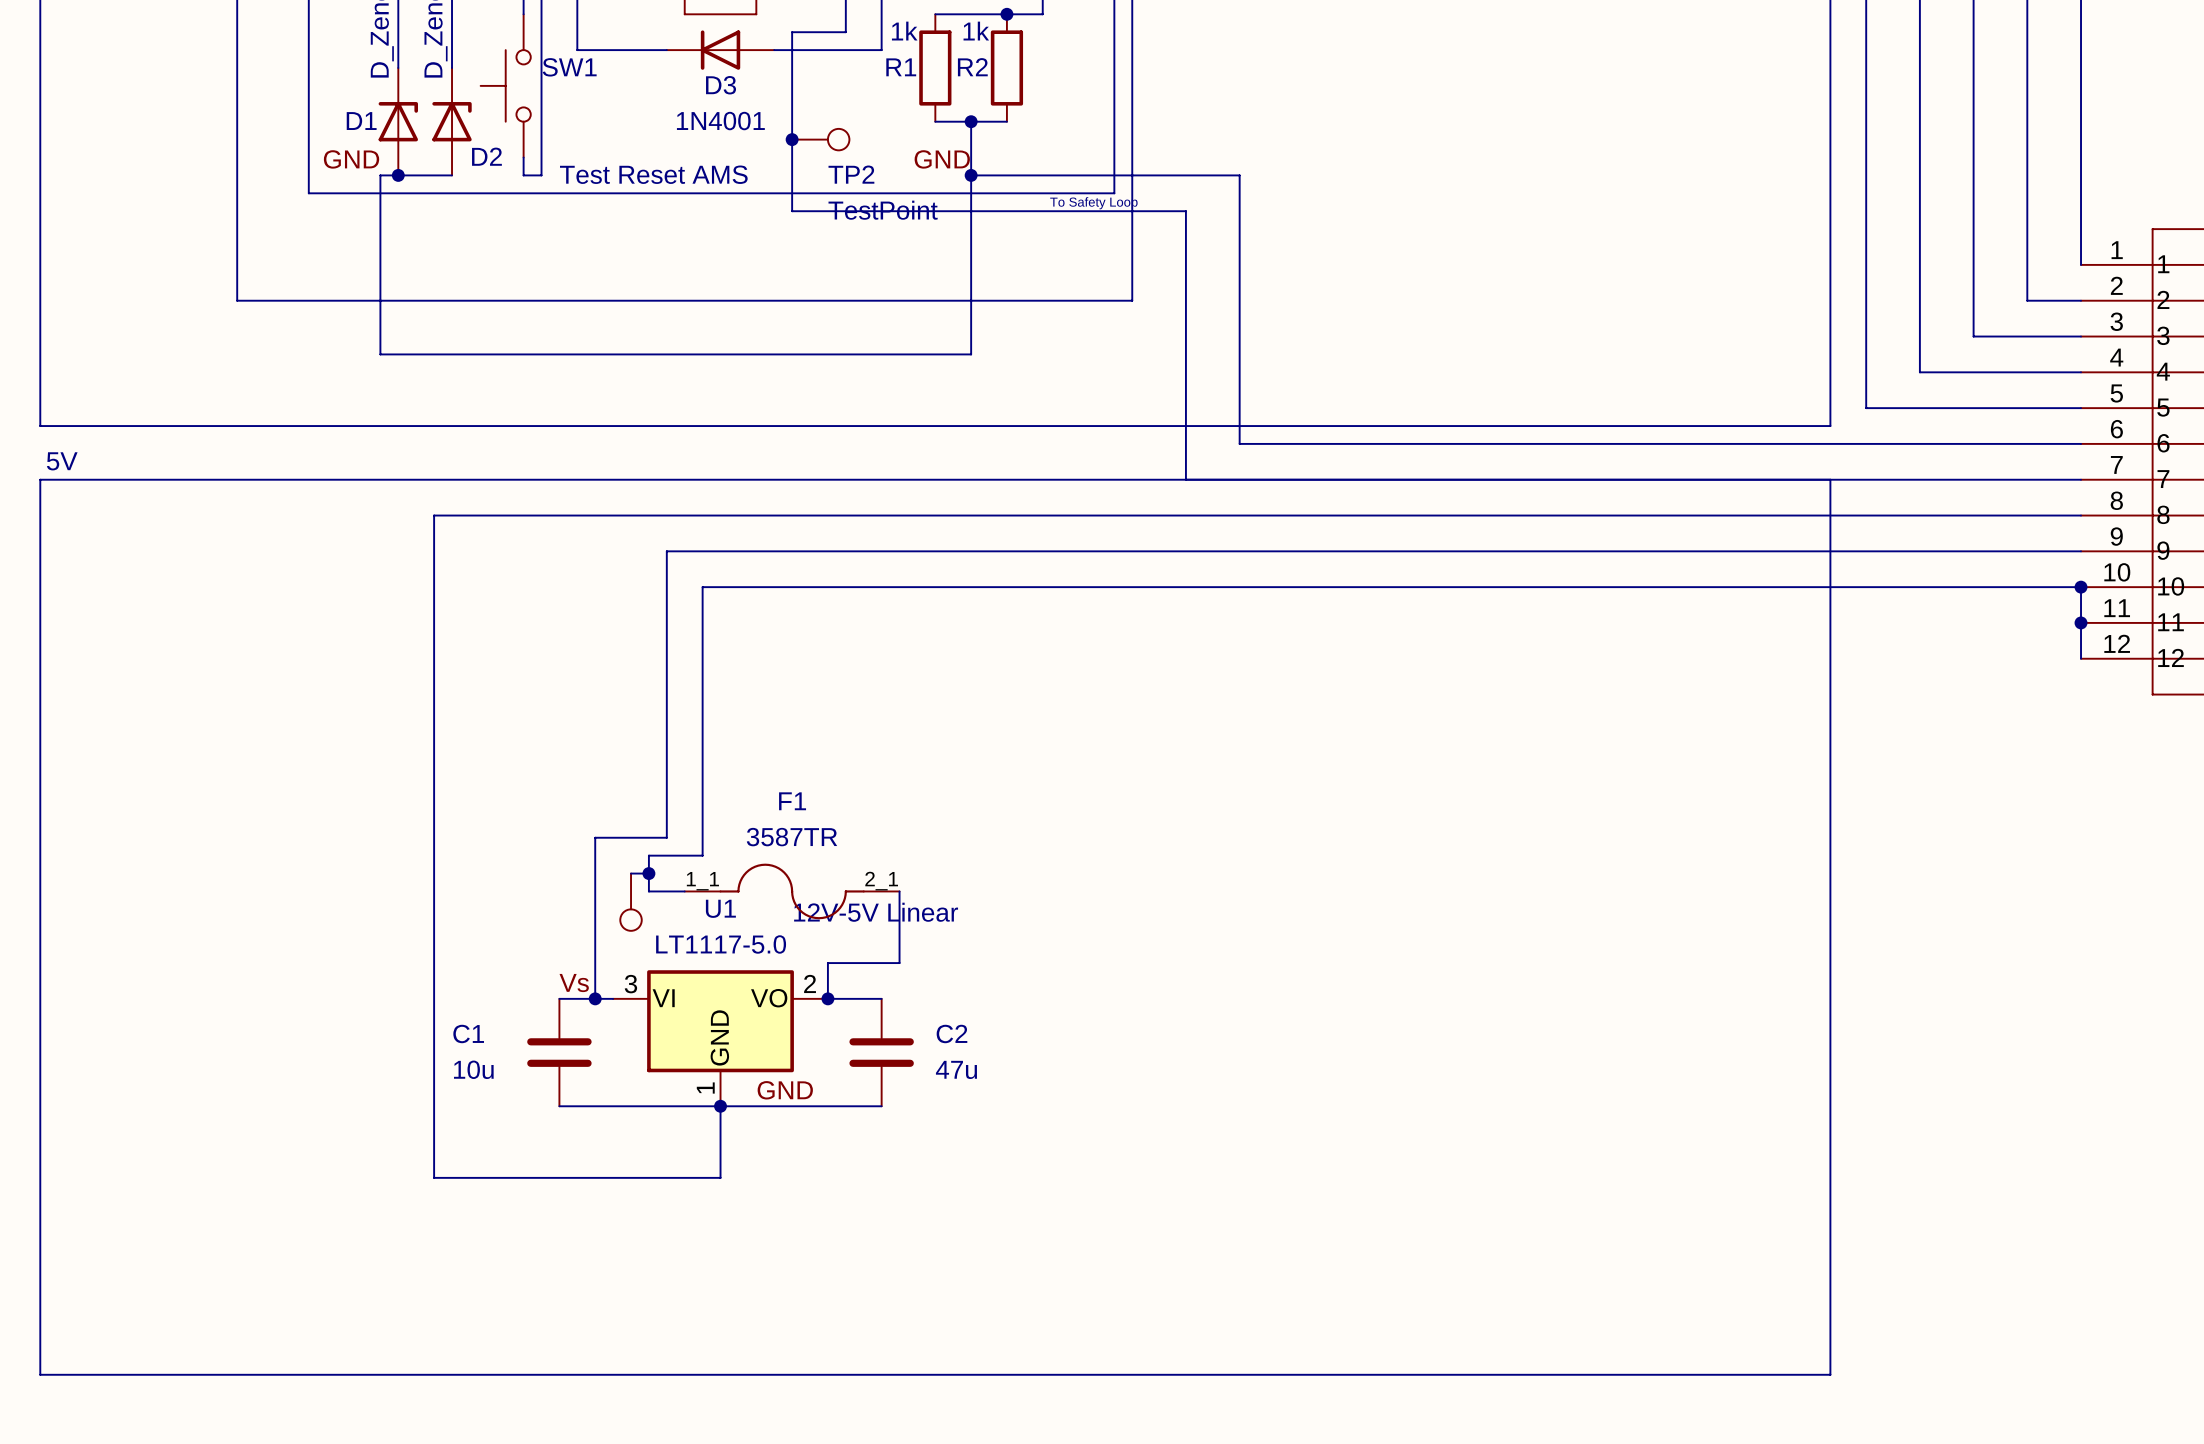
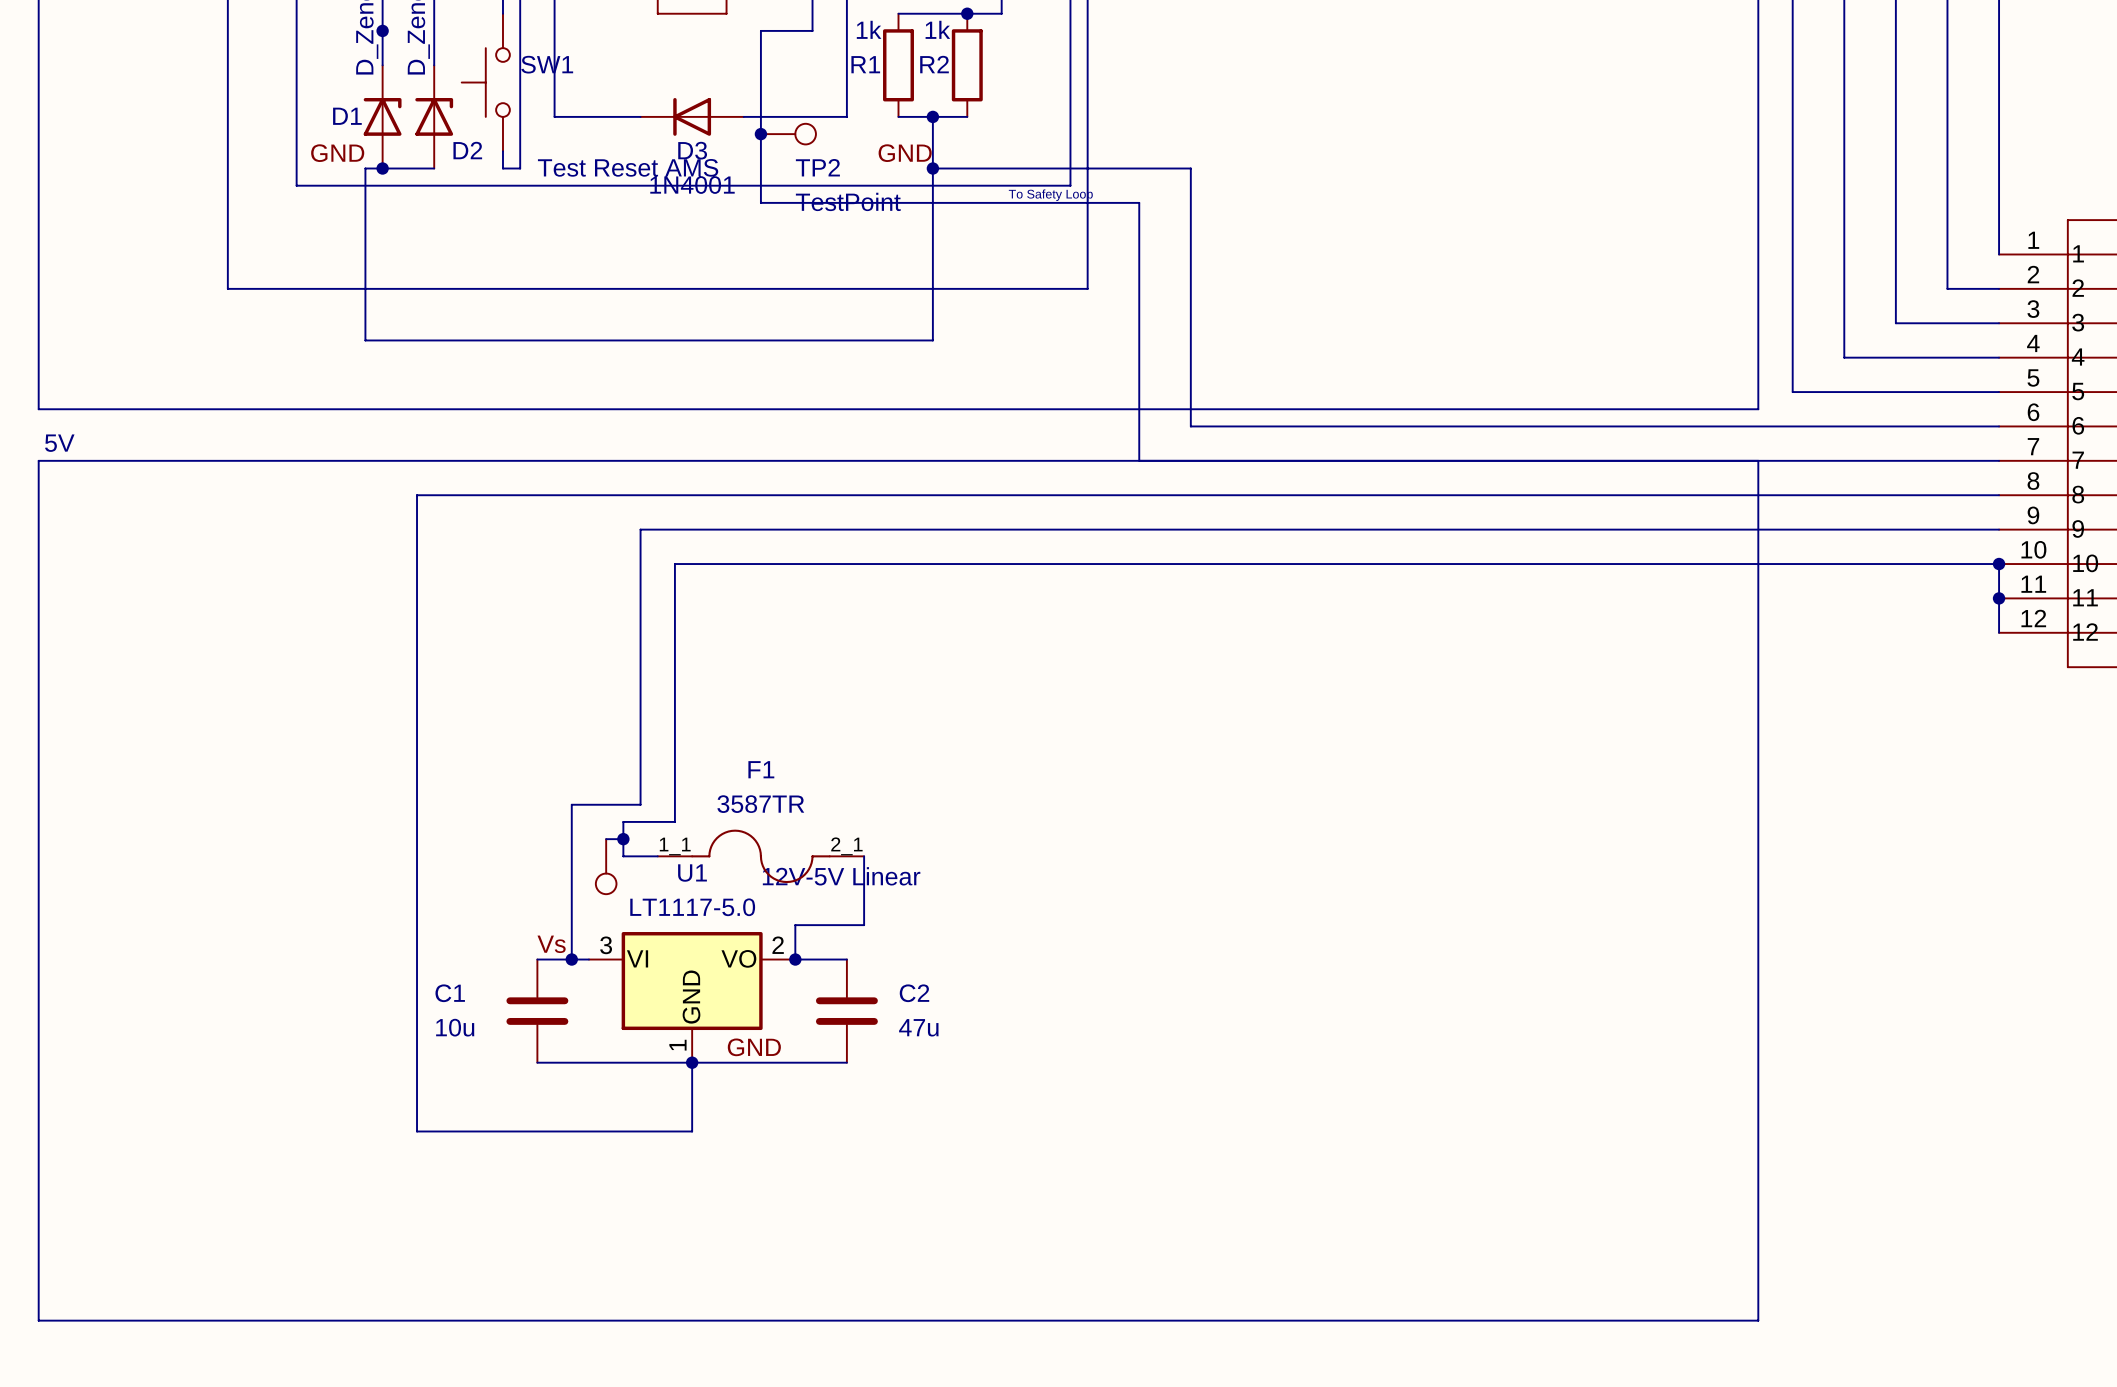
junction: none -> (382, 30)
wire: (577, 50) (666, 50) -> (554, 48) (554, 116) (640, 116)
D3 position: (720, 50) -> (692, 116)
wire: (774, 50) (881, 50) -> (743, 116) (846, 116) (846, 48)

